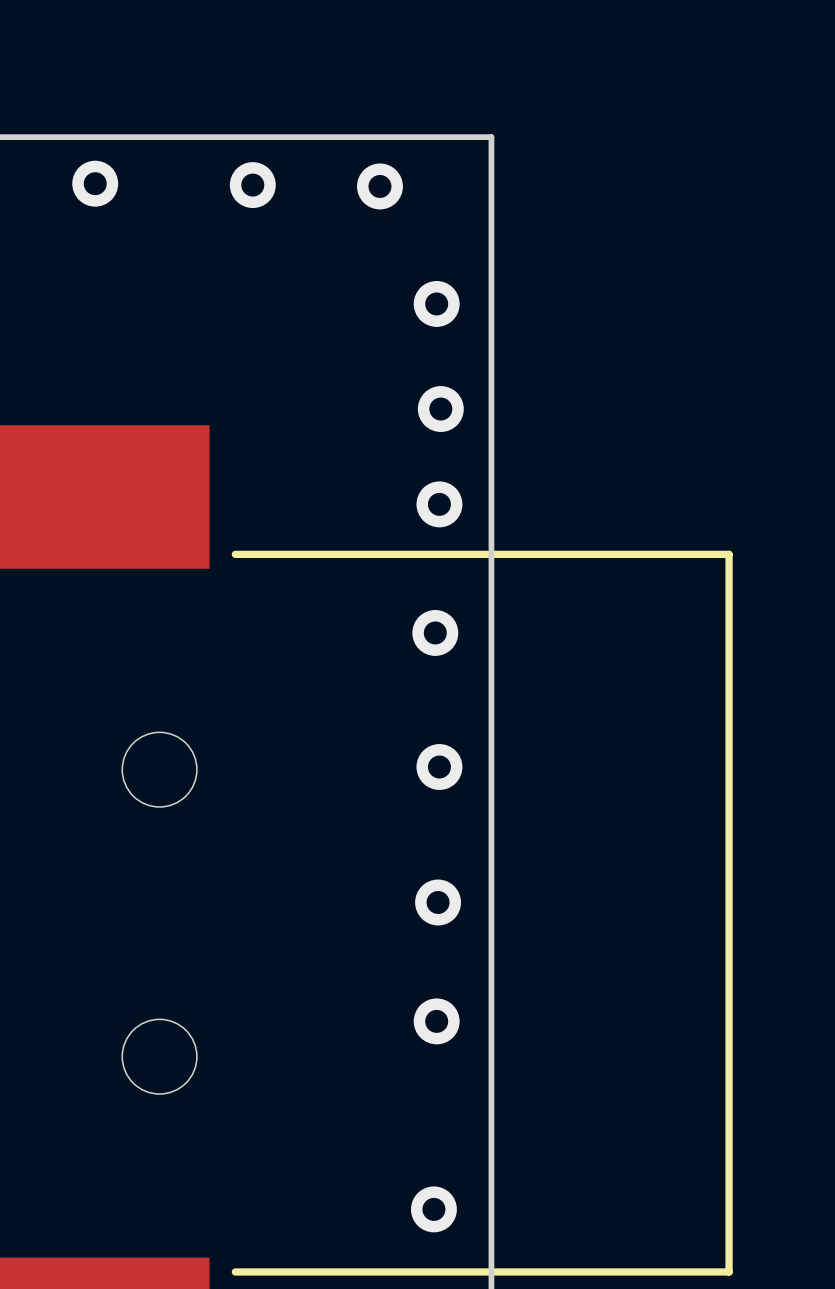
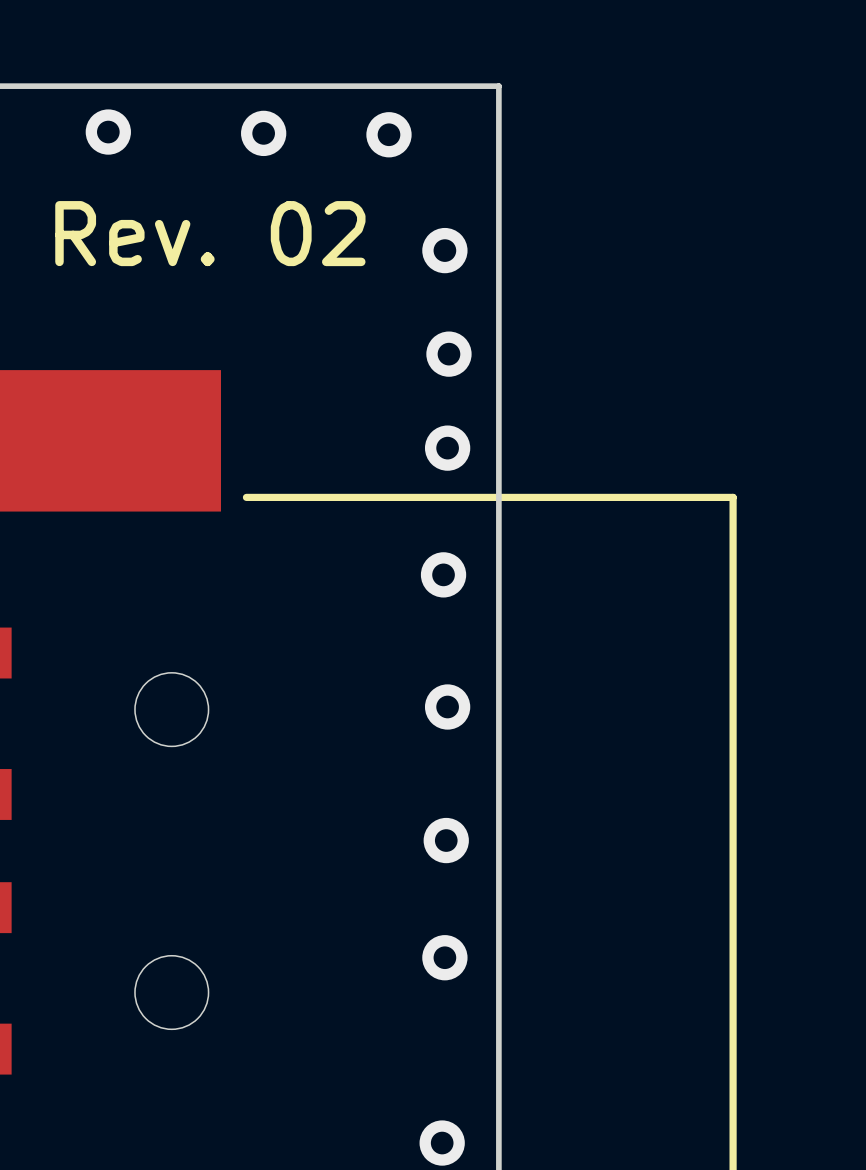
text: none -> Rev. 02 (210, 233)

